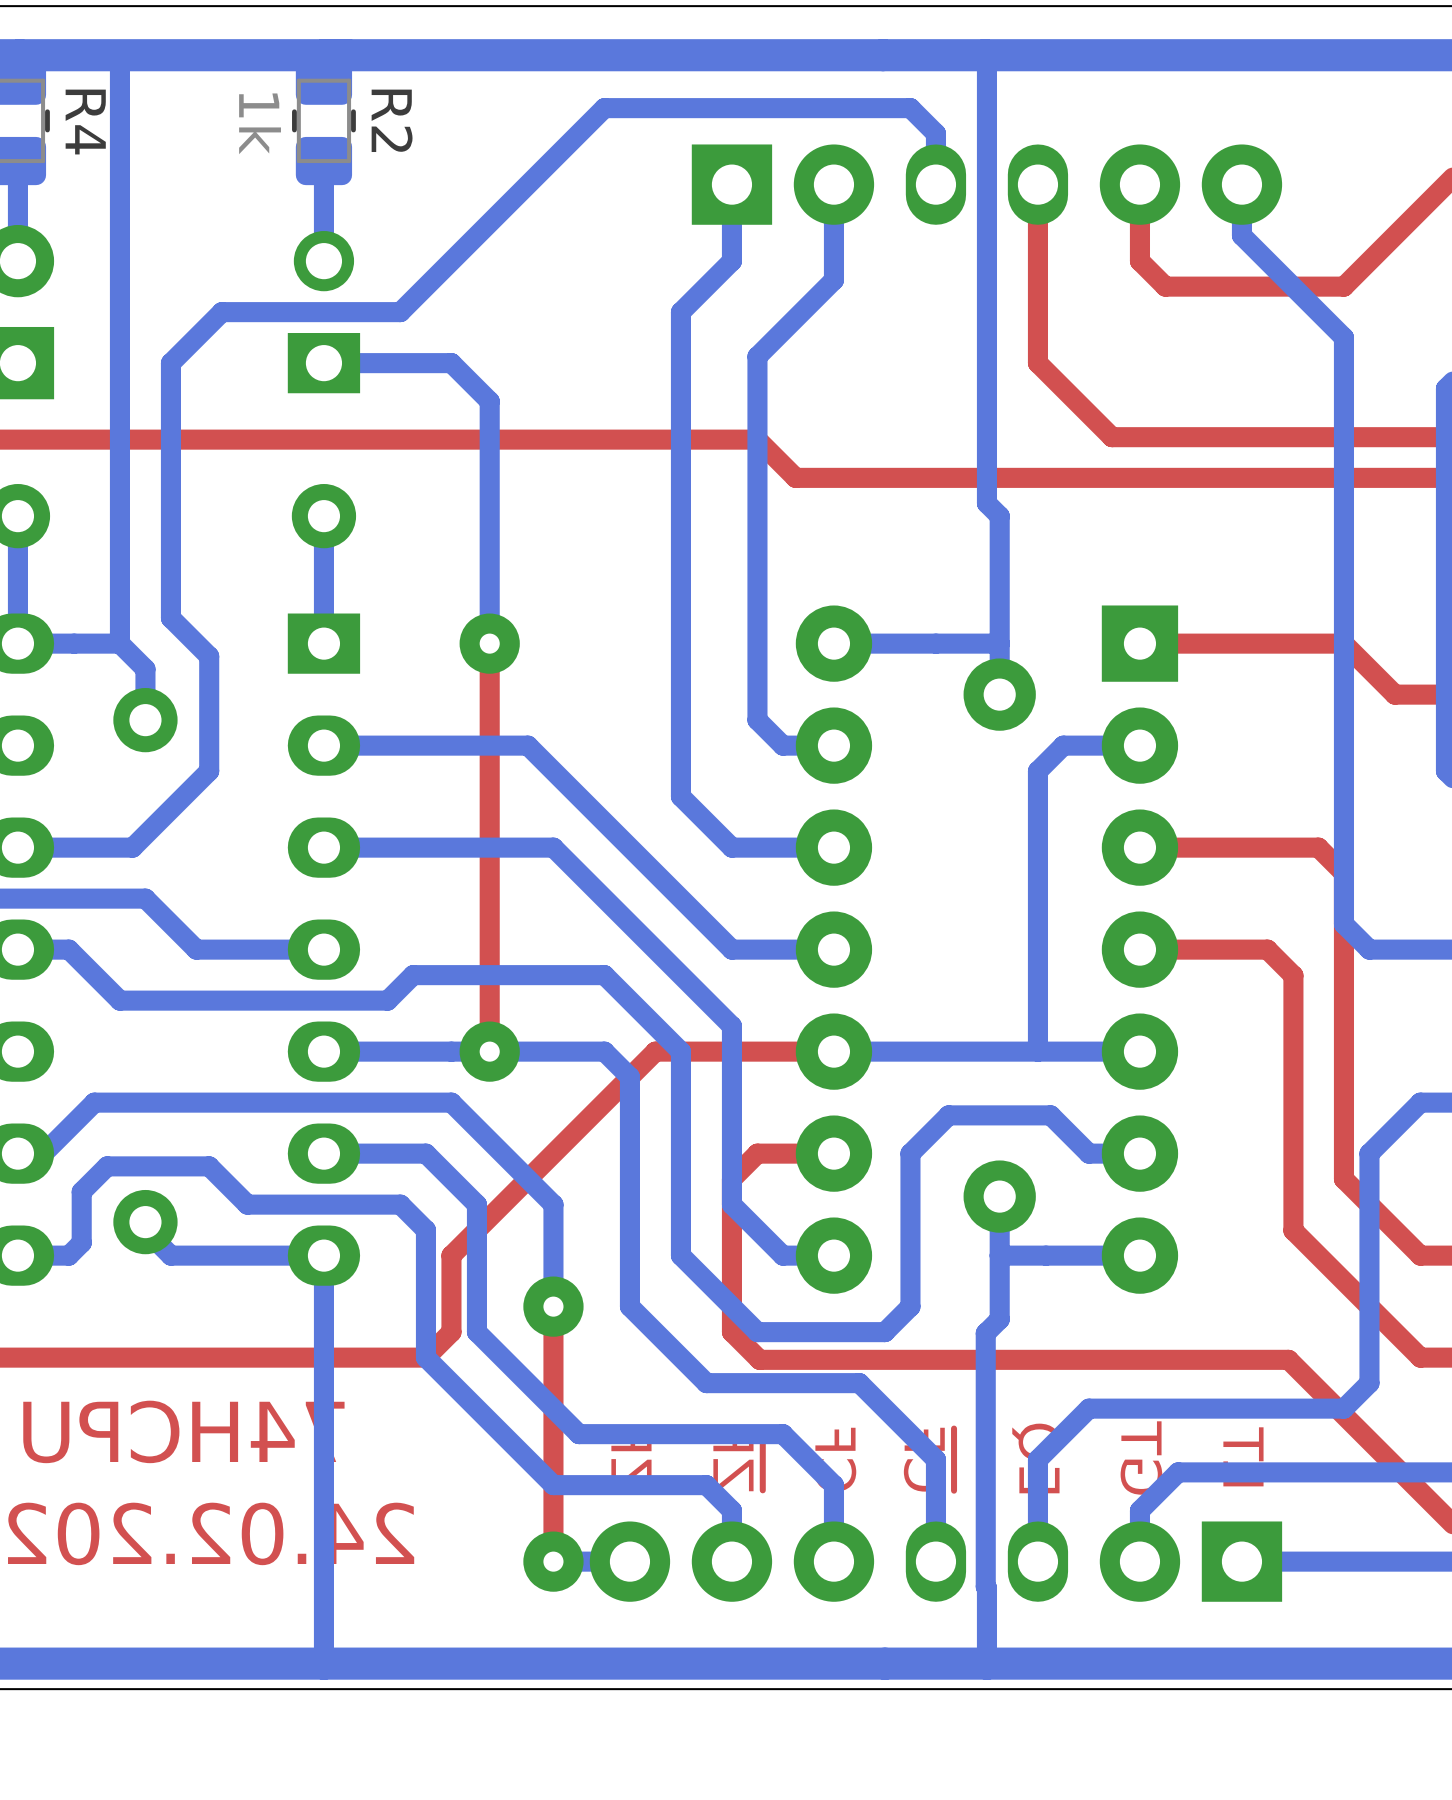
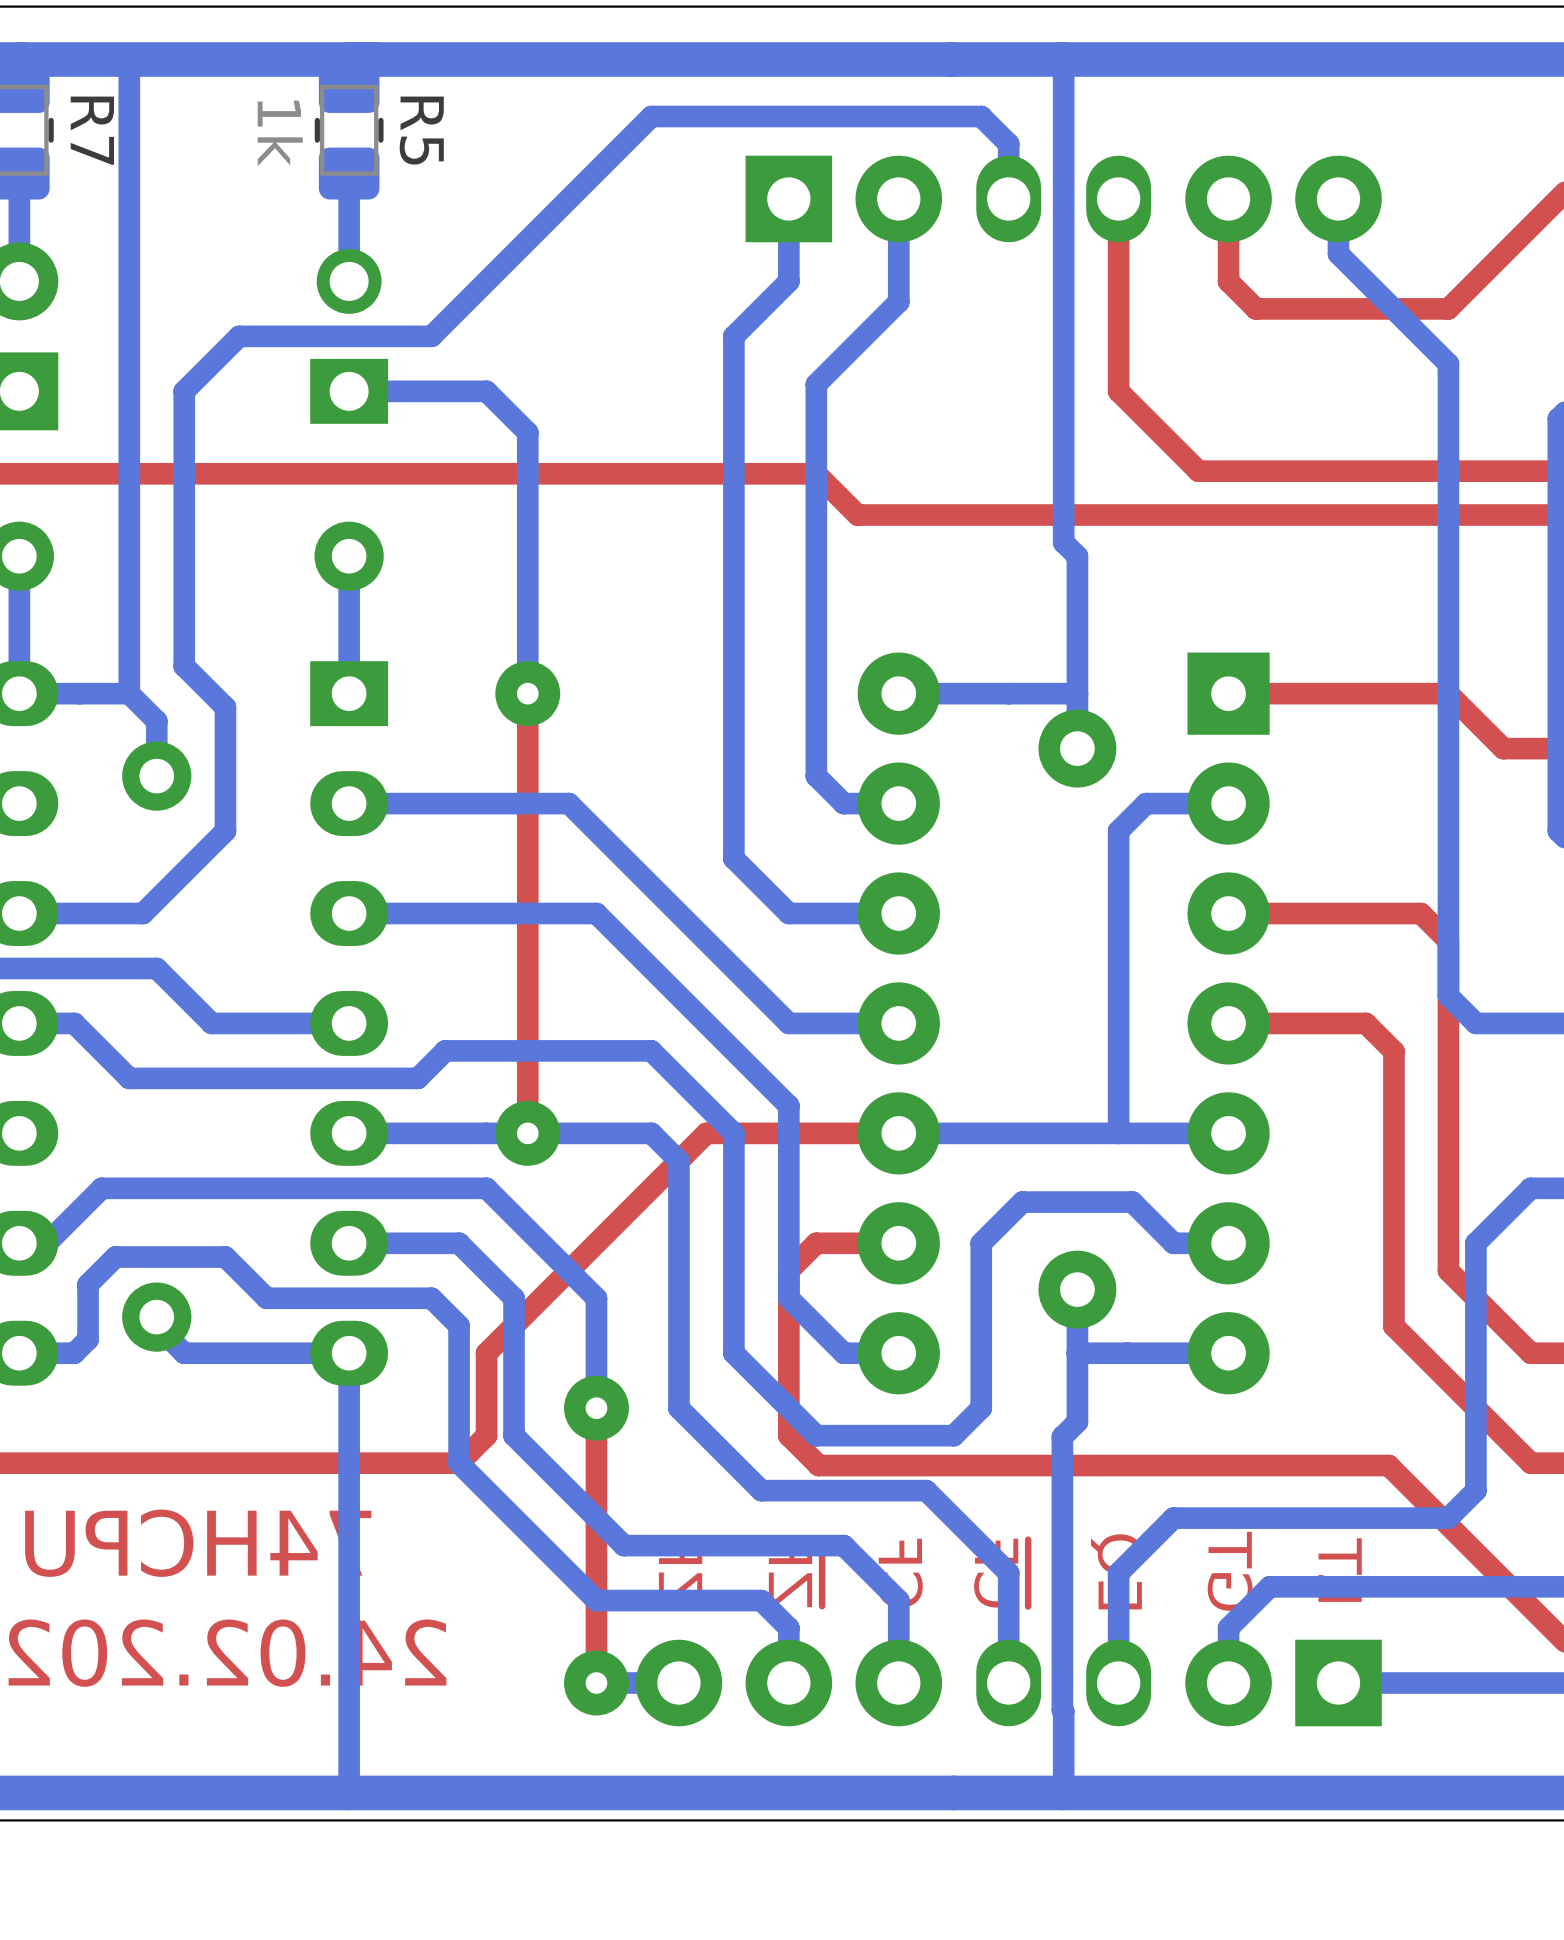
R2 name: R2 (392, 120) -> R5 (421, 130)
R4 name: R4 (85, 122) -> R7 (92, 130)

